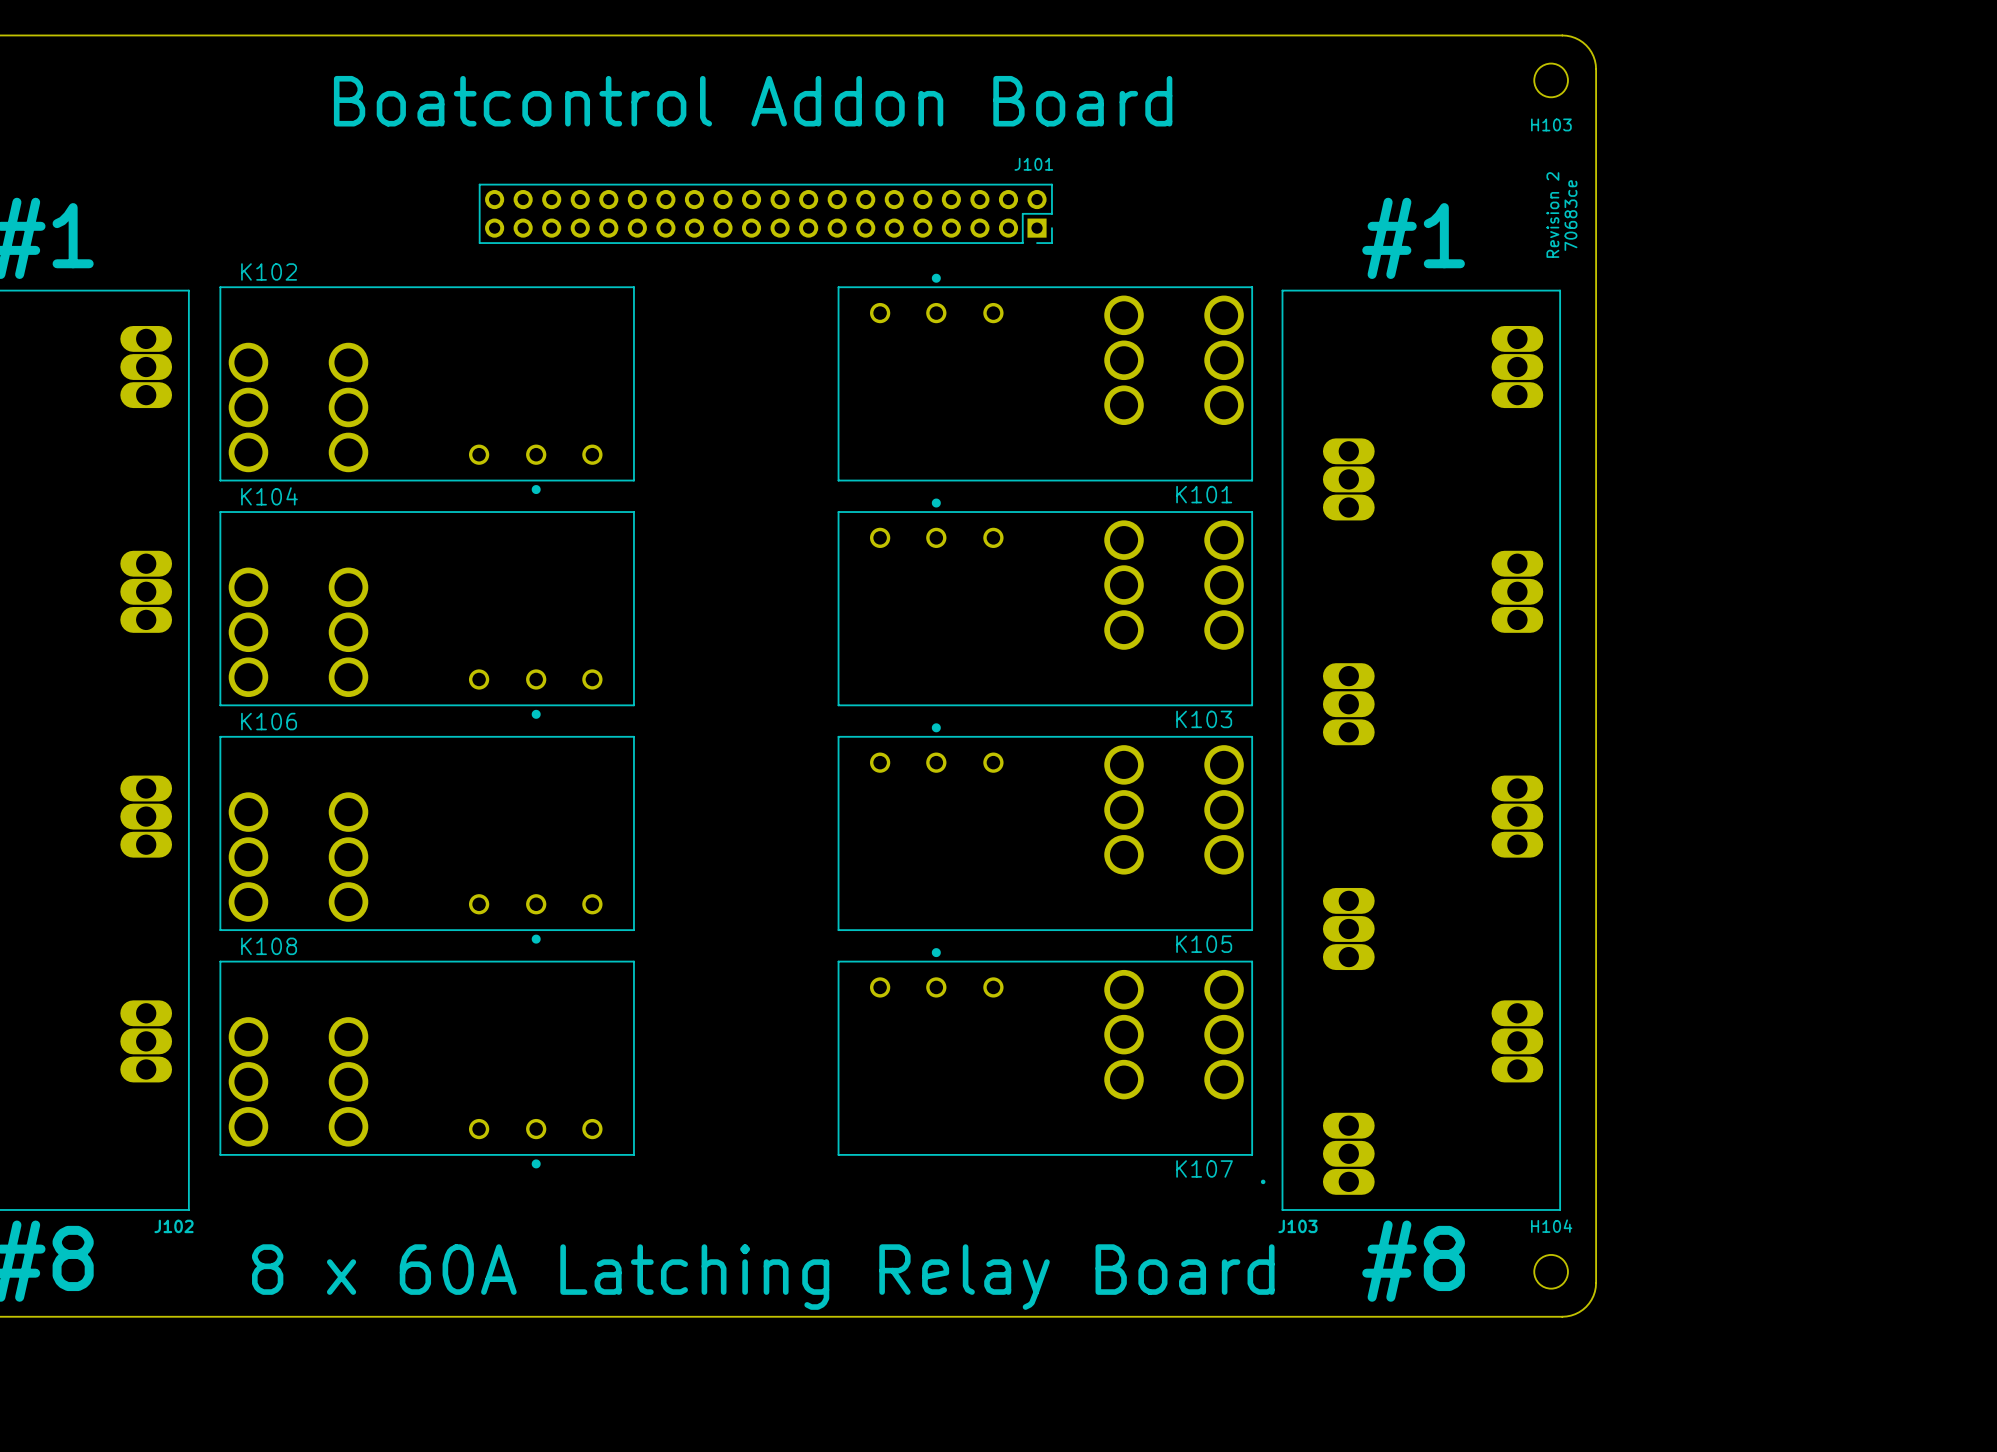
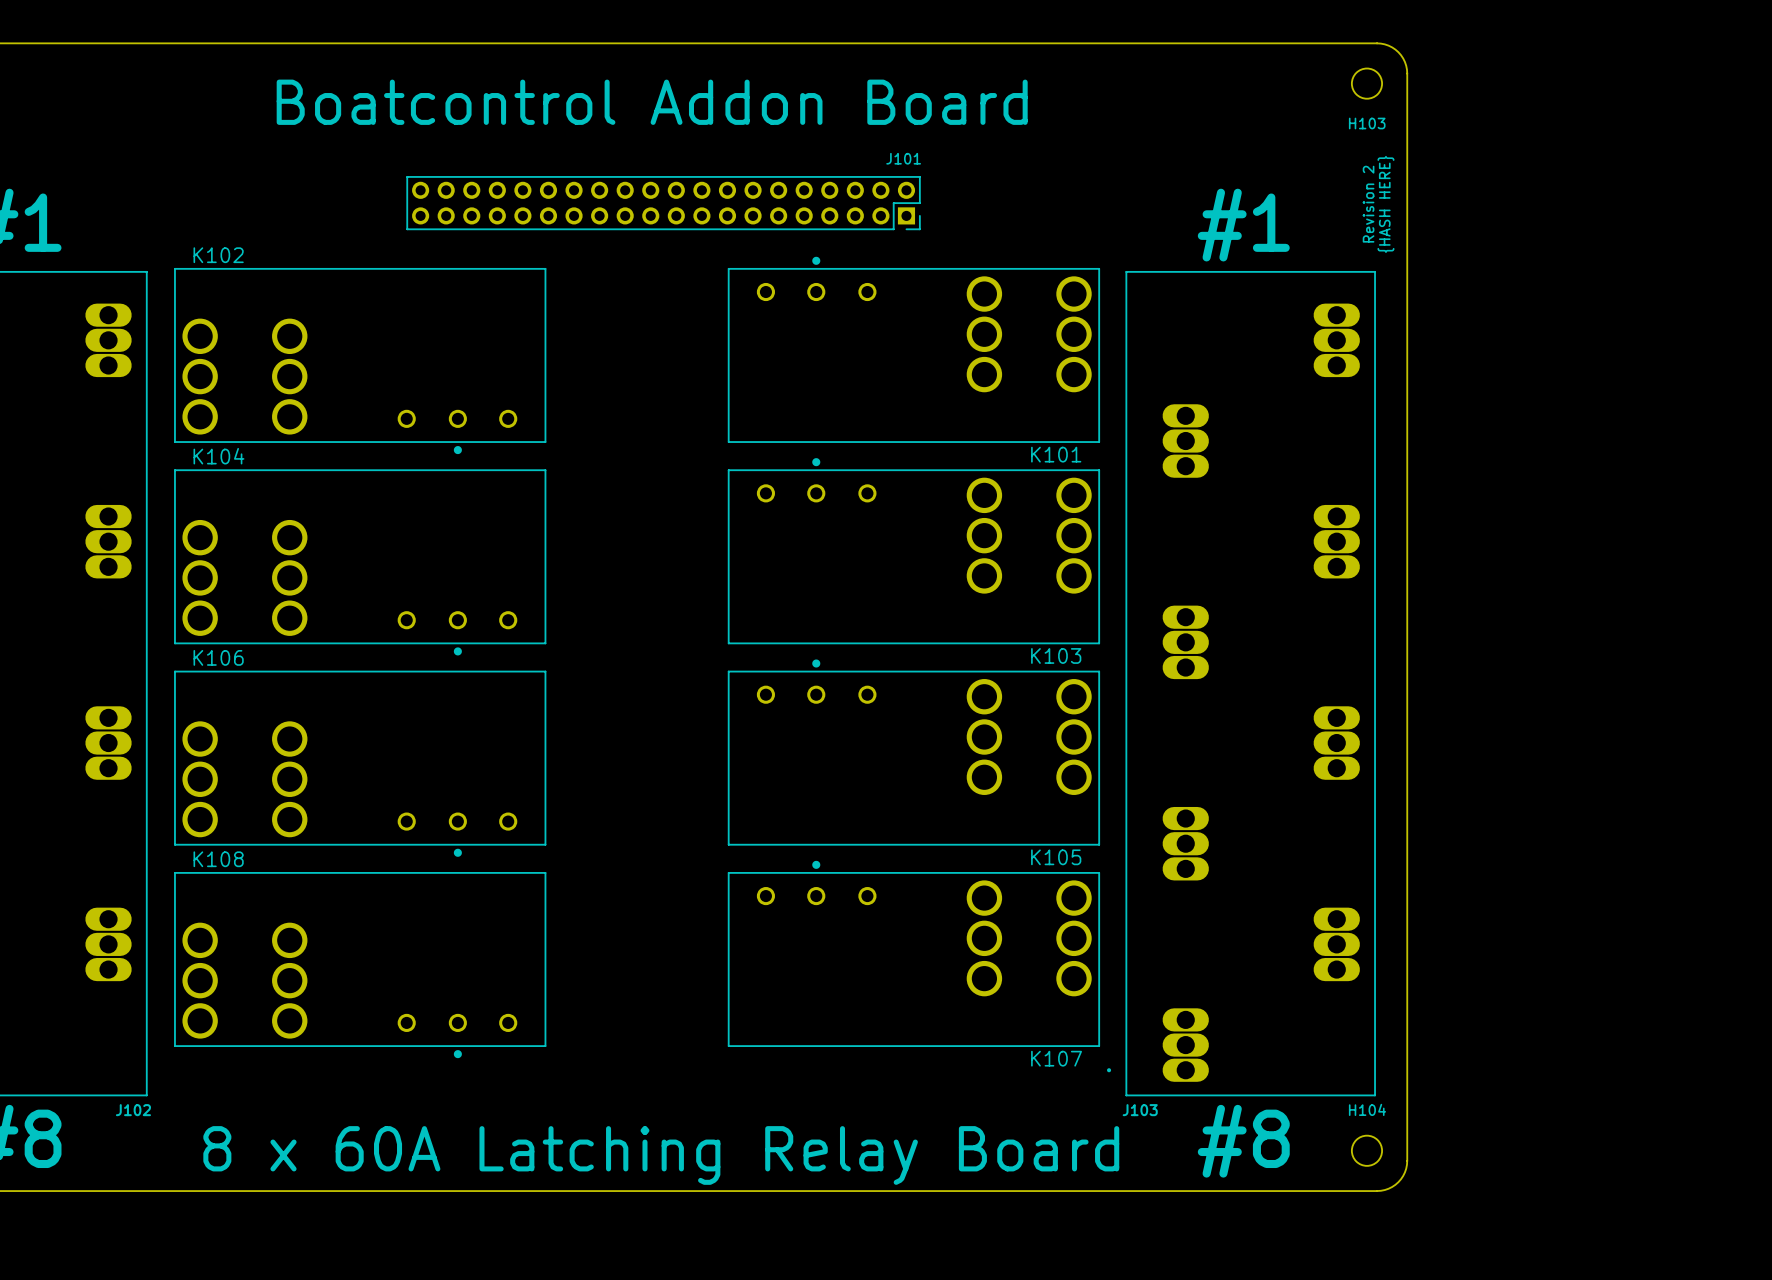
text: 70683ce (1570, 215) -> {HASH HERE} (1385, 204)

